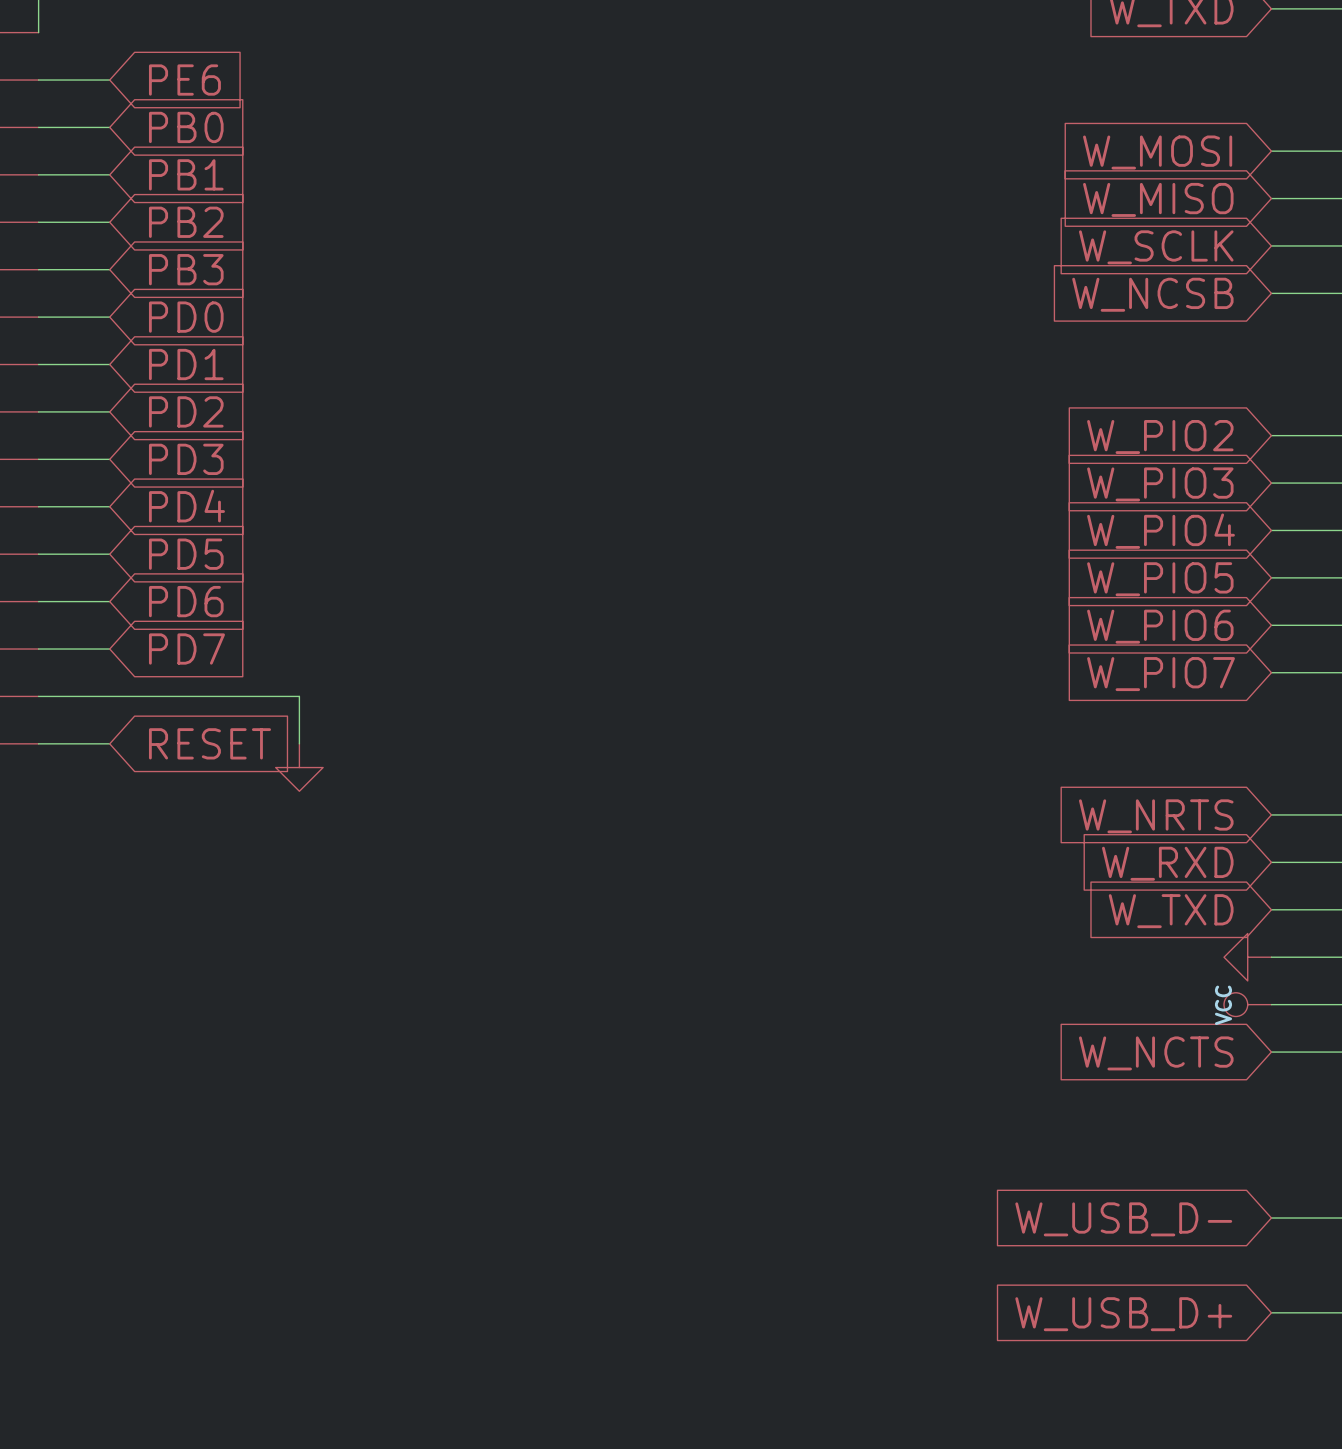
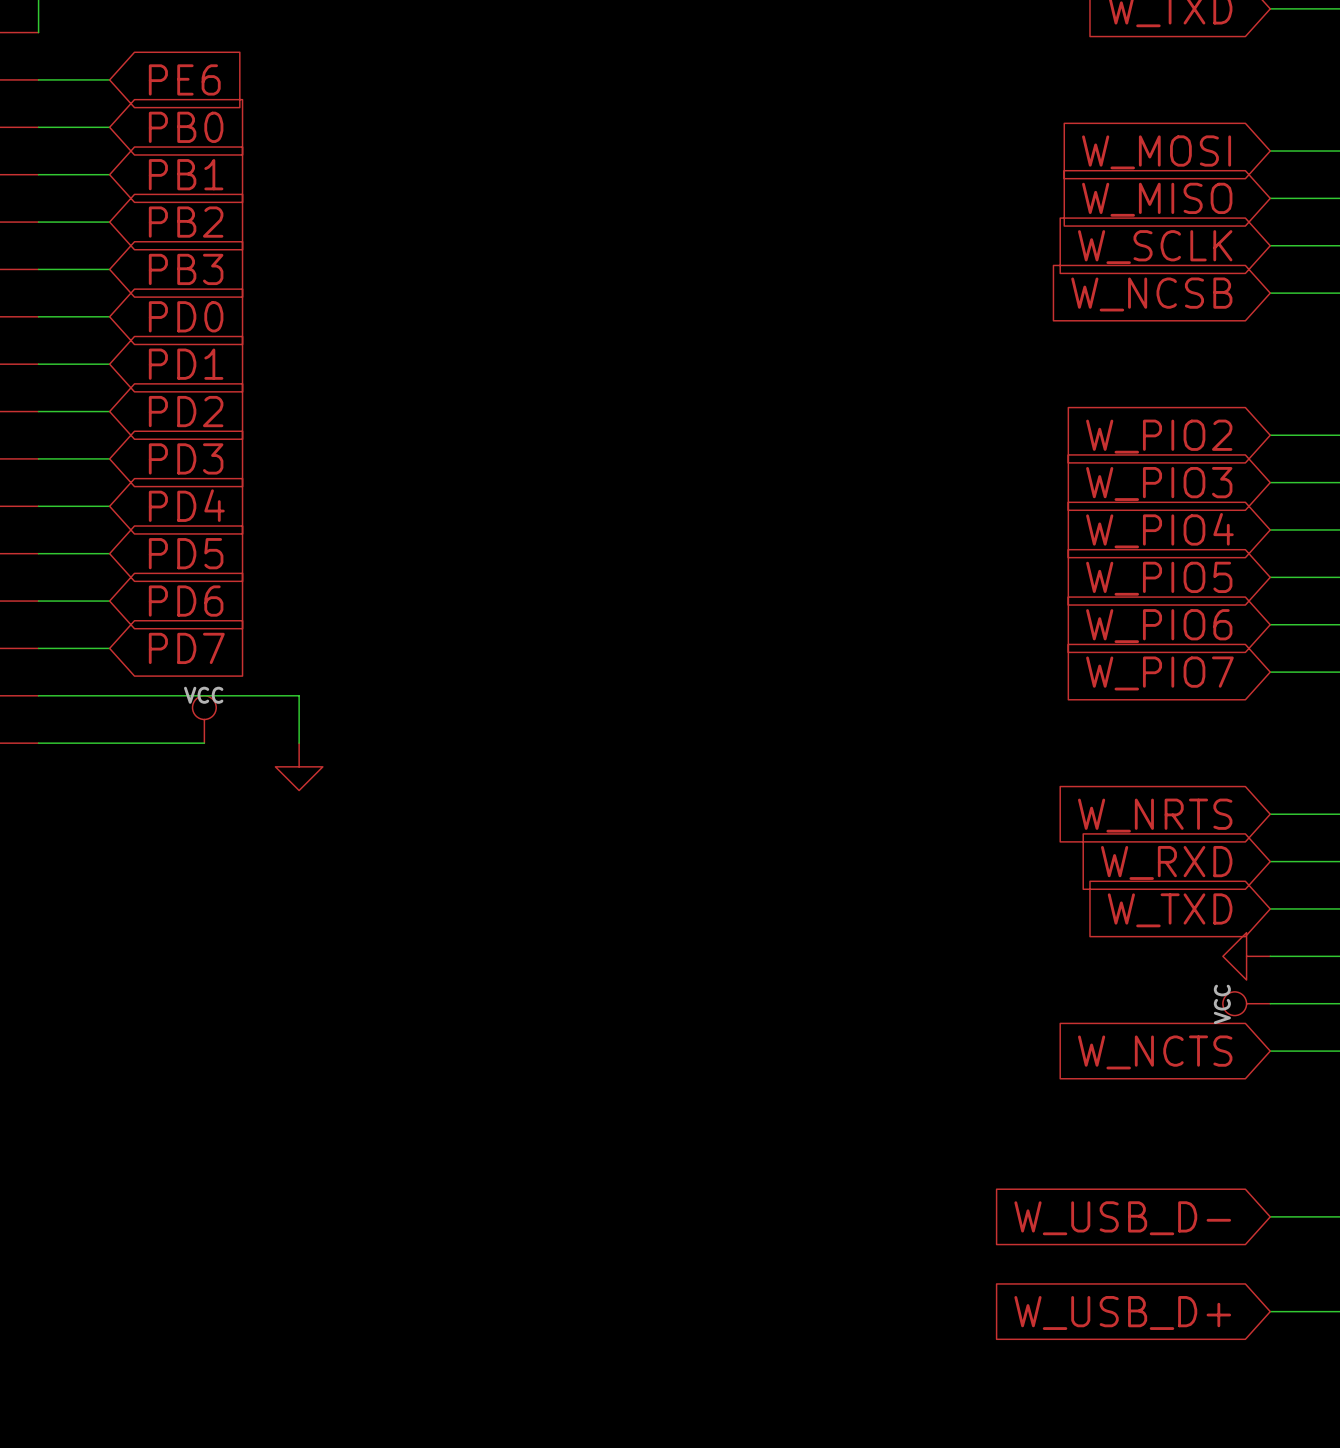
power symbol: none -> VCC (204, 719)
wire: none -> (109, 743) (204, 743)
global label: RESET (209, 743) -> none

